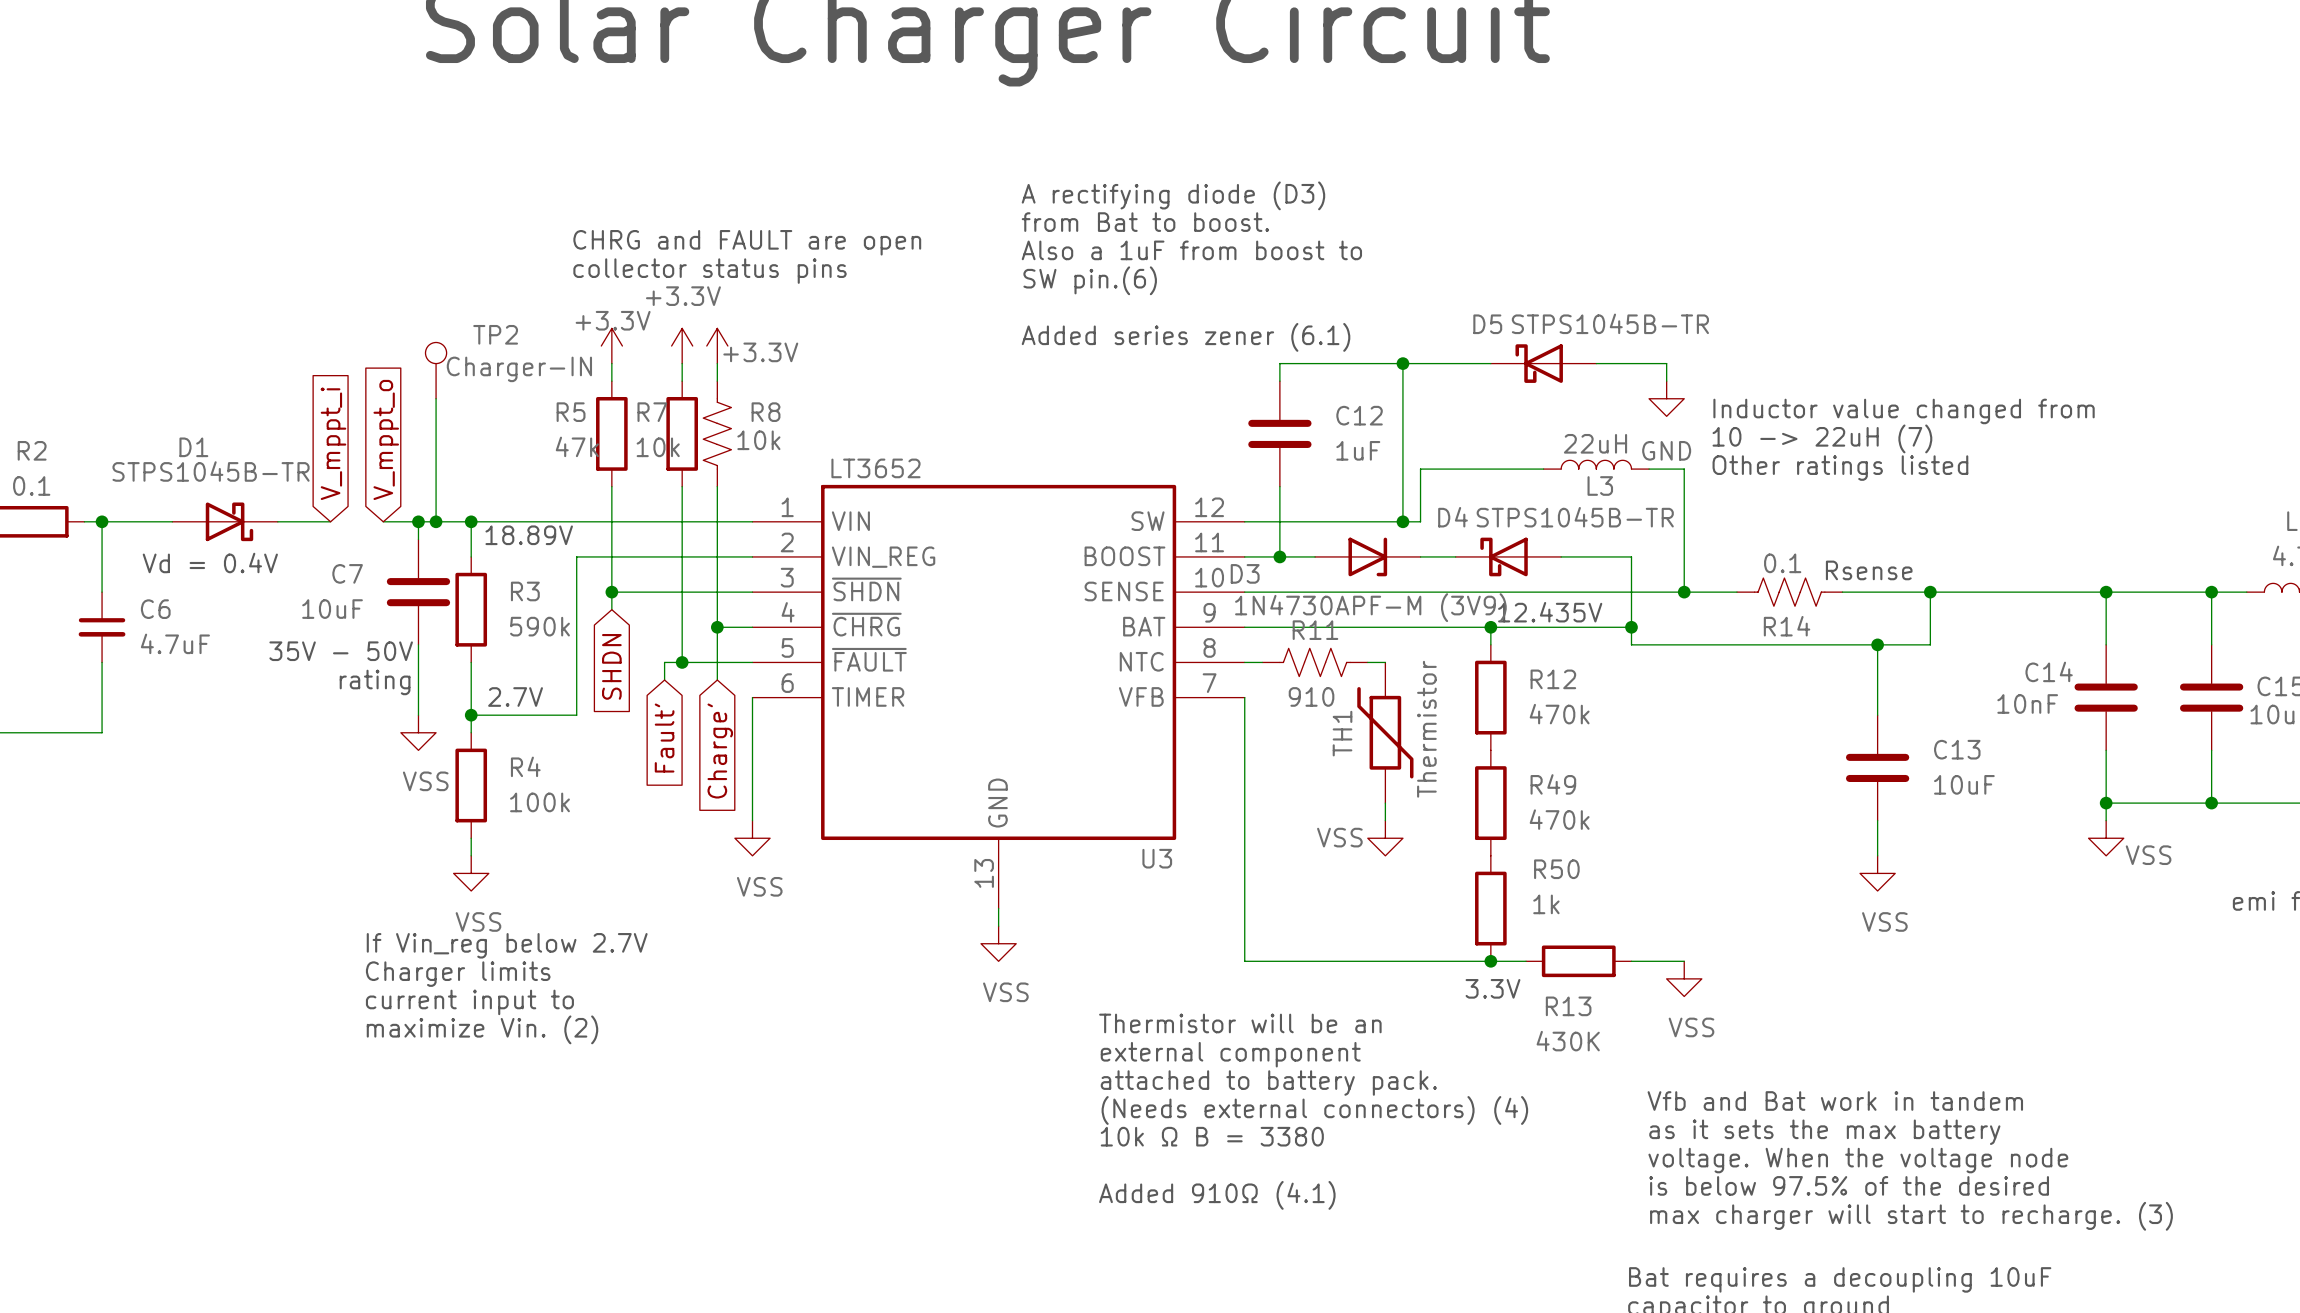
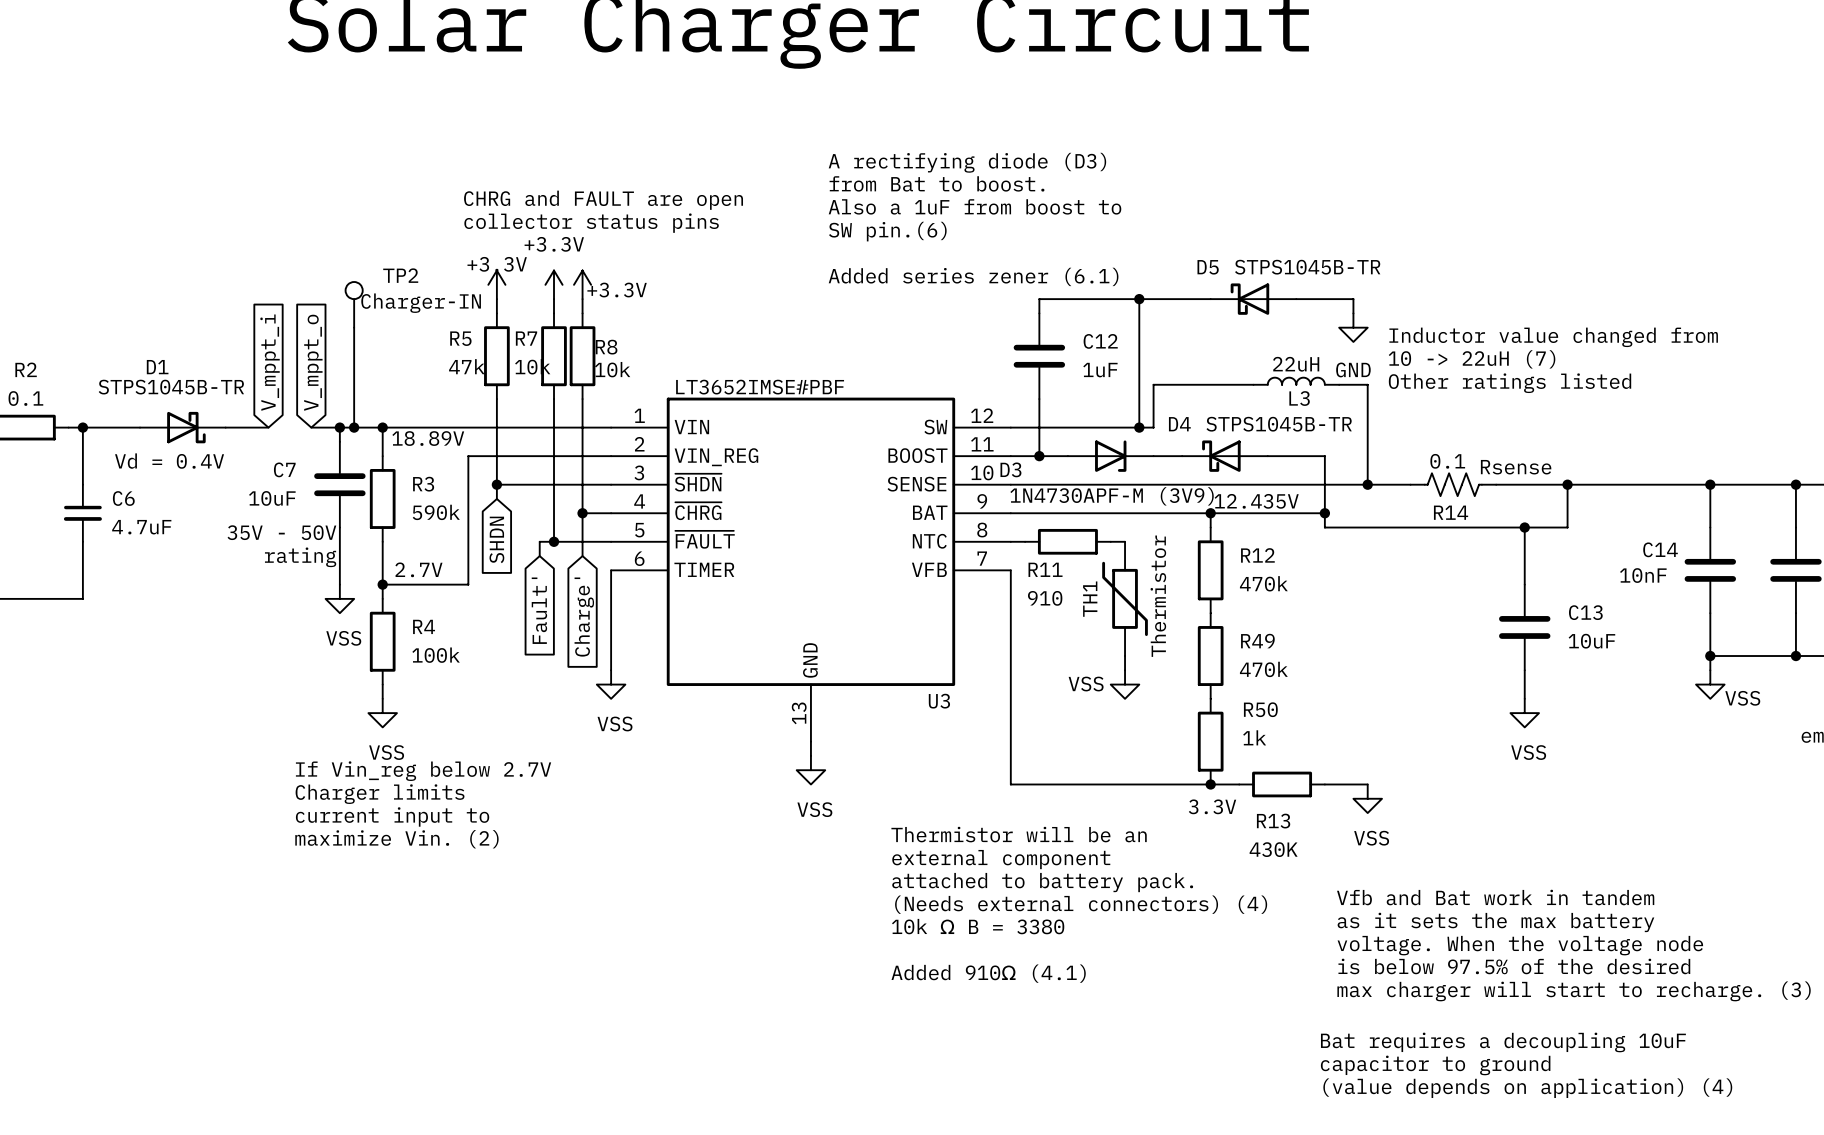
R8 symbol: [703, 381, 732, 487] -> [569, 313, 596, 400]
U3 value: LT3652 (875, 468) -> LT3652IMSE#PBF (760, 387)
R11 name position: R11 (1315, 630) -> R11 (1045, 569)
R11 symbol: [1262, 648, 1368, 677] -> [1025, 528, 1111, 555]
R11 value position: 910 (1311, 696) -> 910 (1045, 598)

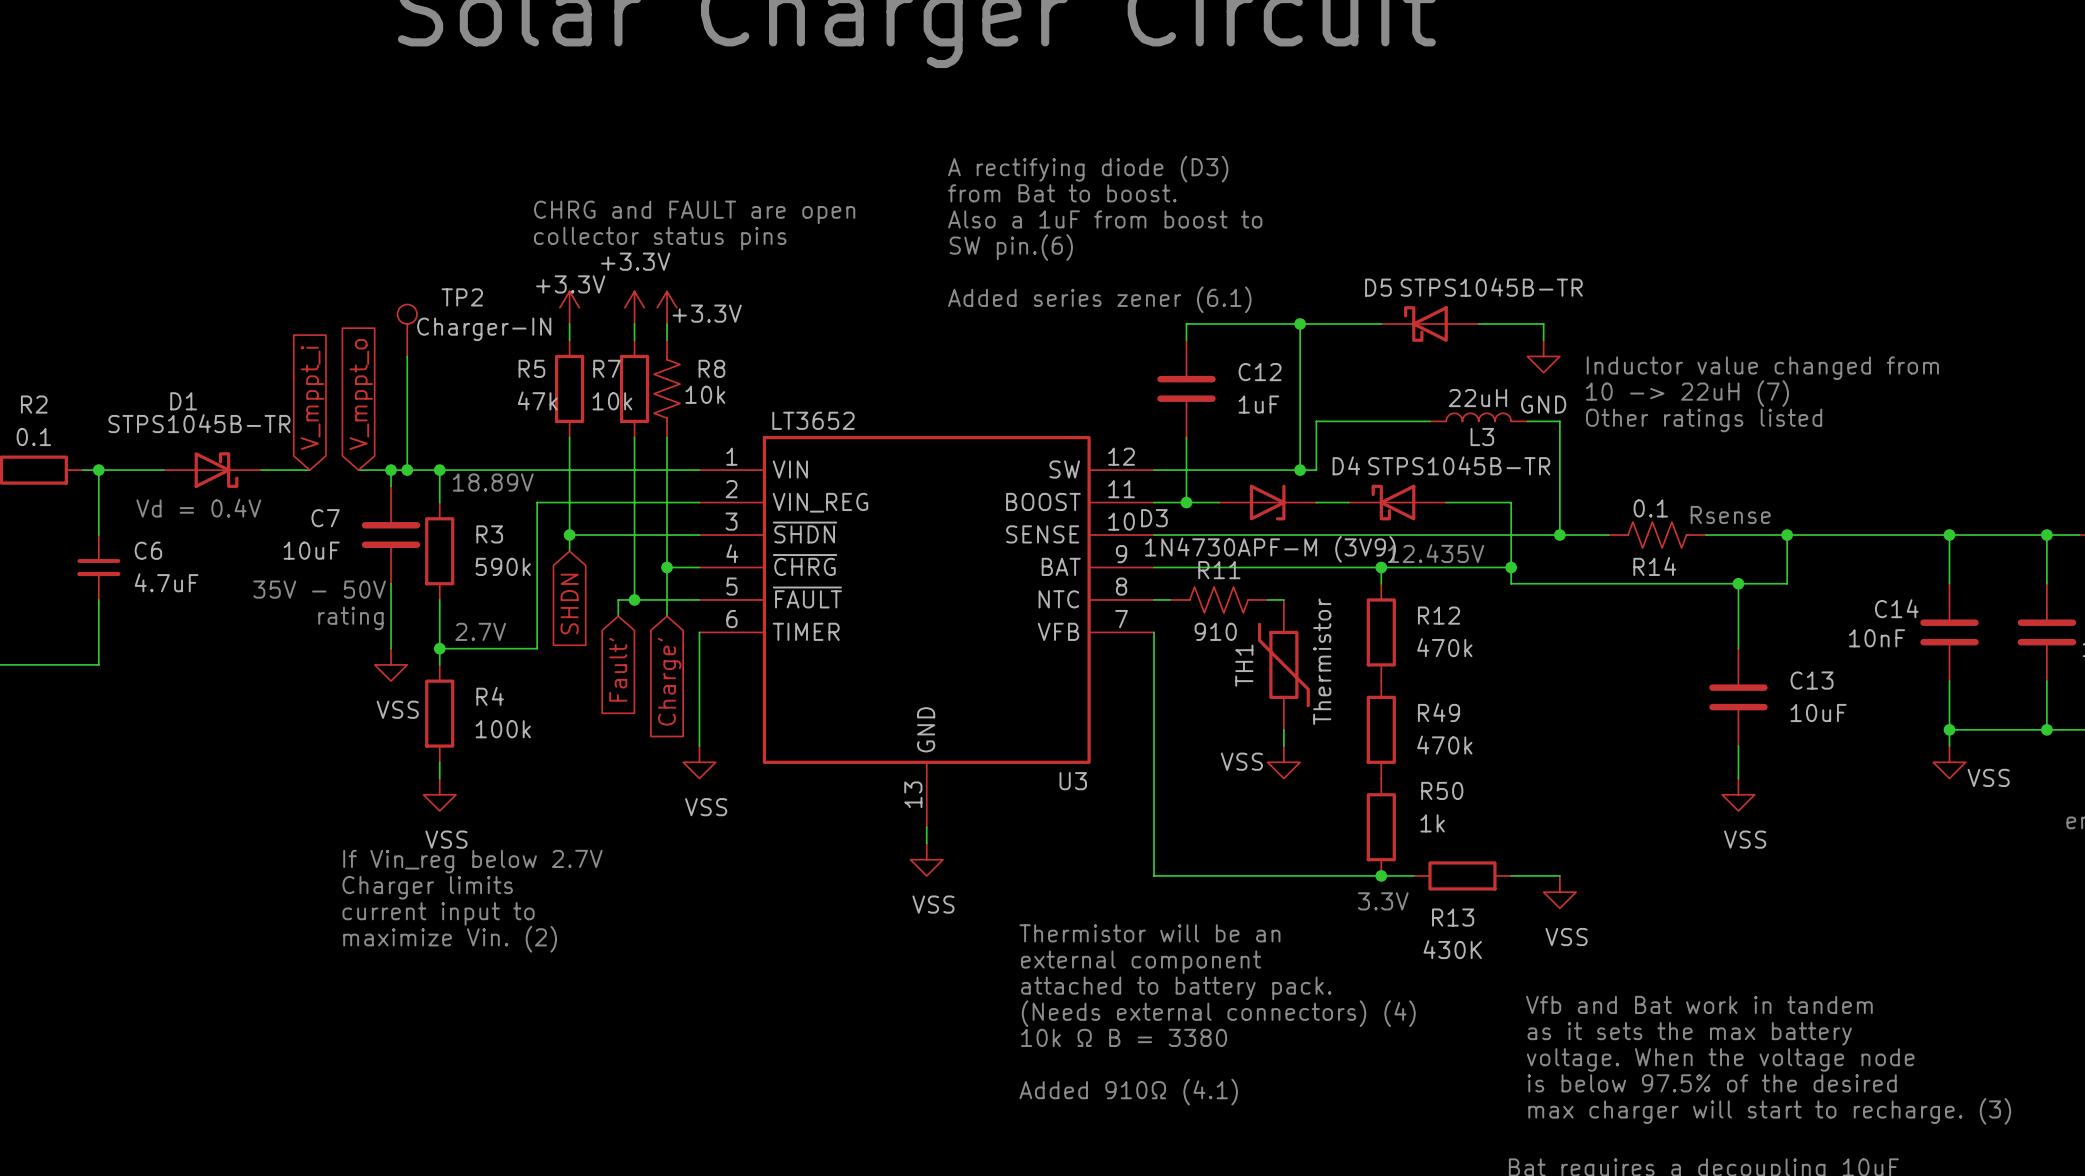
R8 symbol: [569, 313, 596, 400] -> [654, 340, 680, 438]
U3 value: LT3652IMSE#PBF (760, 387) -> LT3652 (813, 420)
R11 symbol: [1025, 528, 1111, 555] -> [1170, 586, 1268, 613]
R11 name position: R11 (1045, 569) -> R11 (1219, 570)
R11 value position: 910 (1045, 598) -> 910 (1215, 631)

